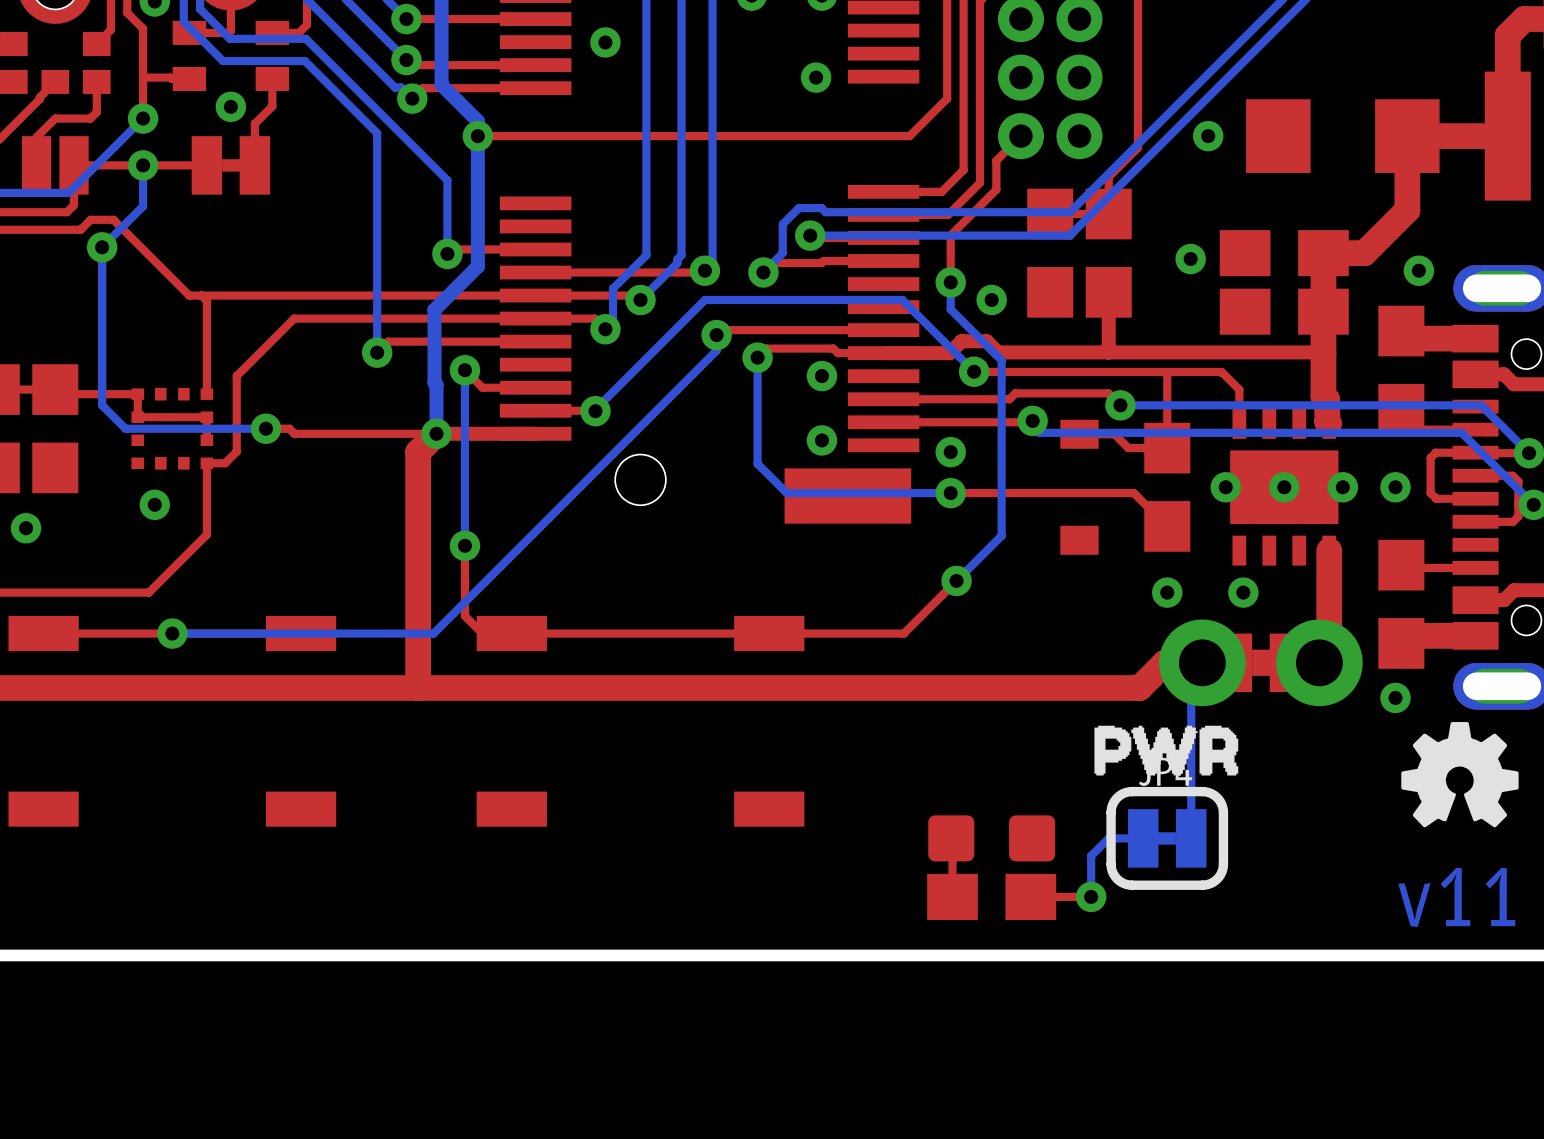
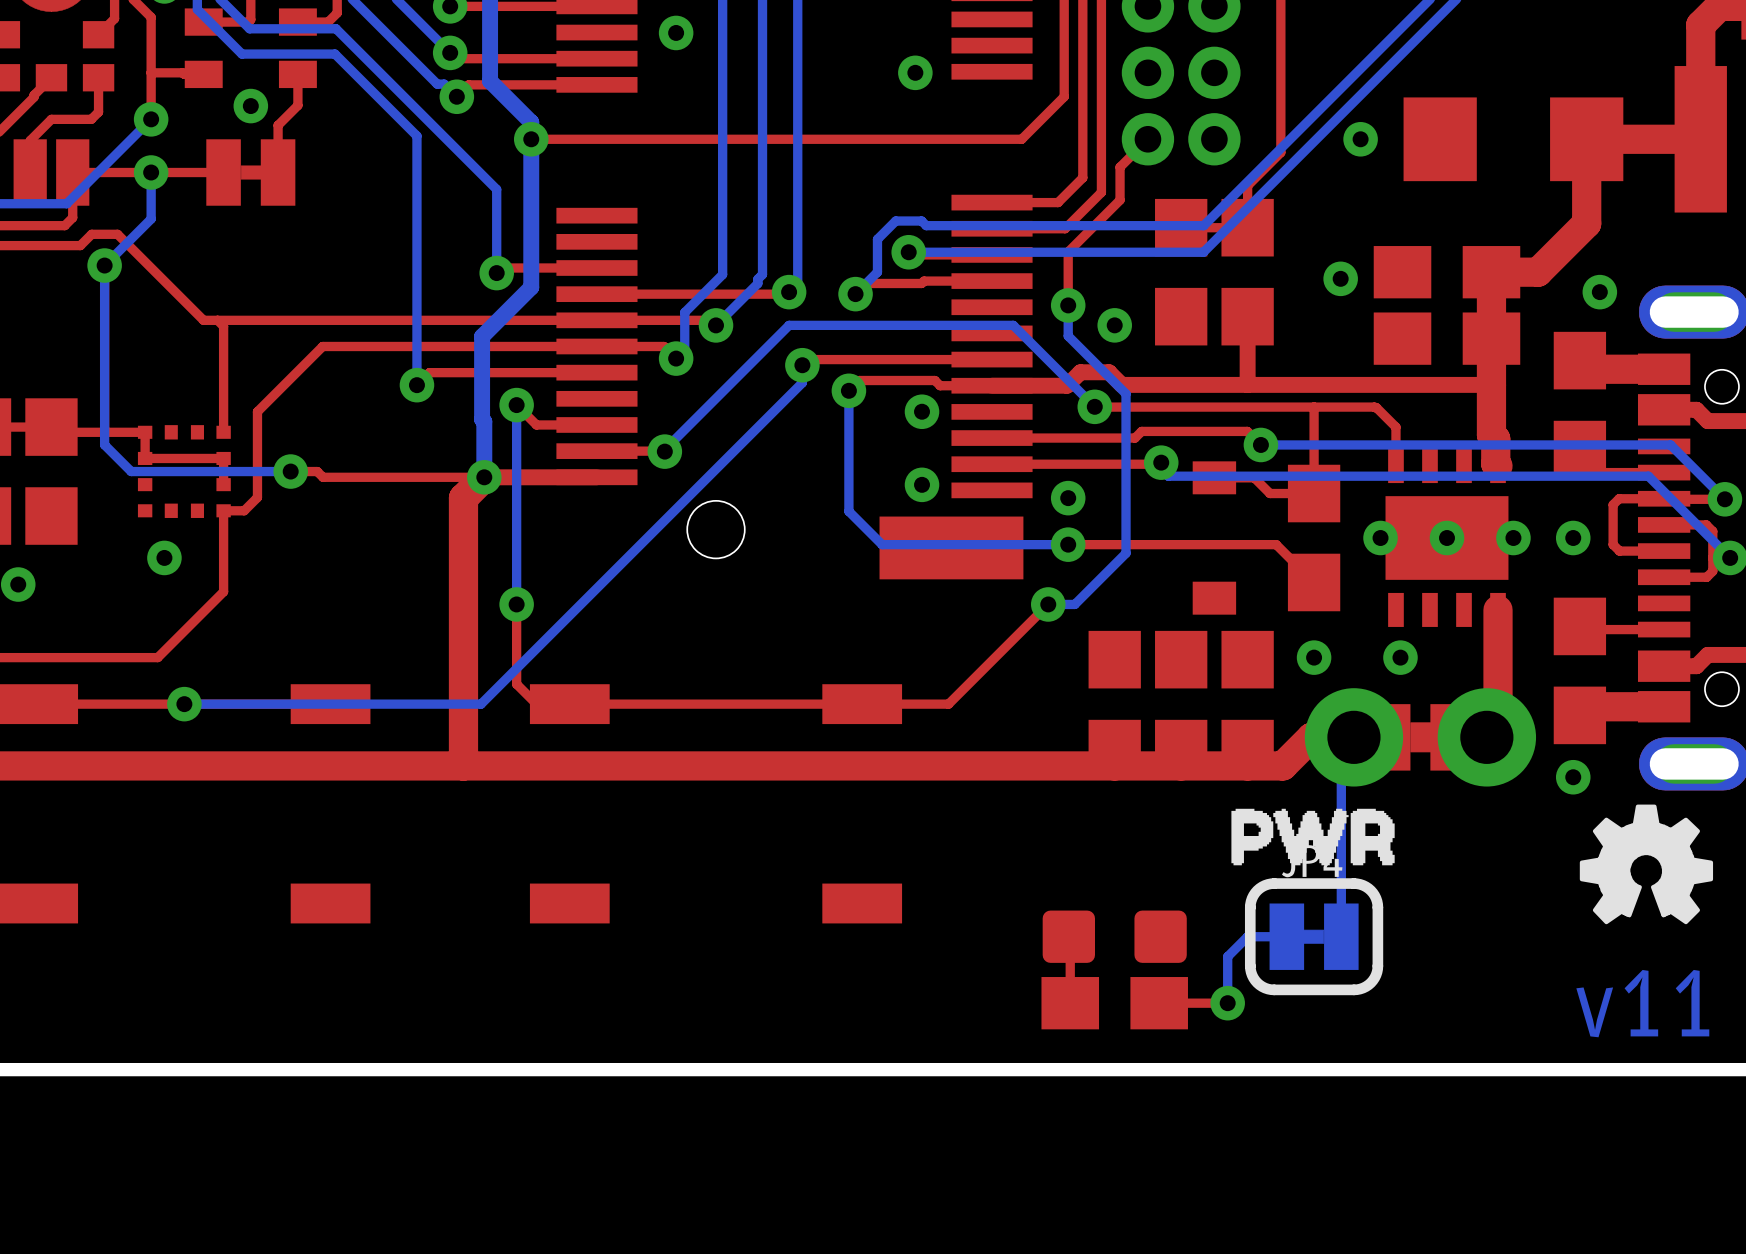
bottom track: (1001, 500) (1001, 535) (956, 580) -> (1126, 553) (1074, 604) (1048, 604)
top track: (956, 580) (903, 633) (845, 633) -> (1048, 604) (948, 704)
via position: (956, 580) -> (1048, 604)
part: none -> (1114, 704)
part: none -> (1181, 704)
part: none -> (1247, 704)

